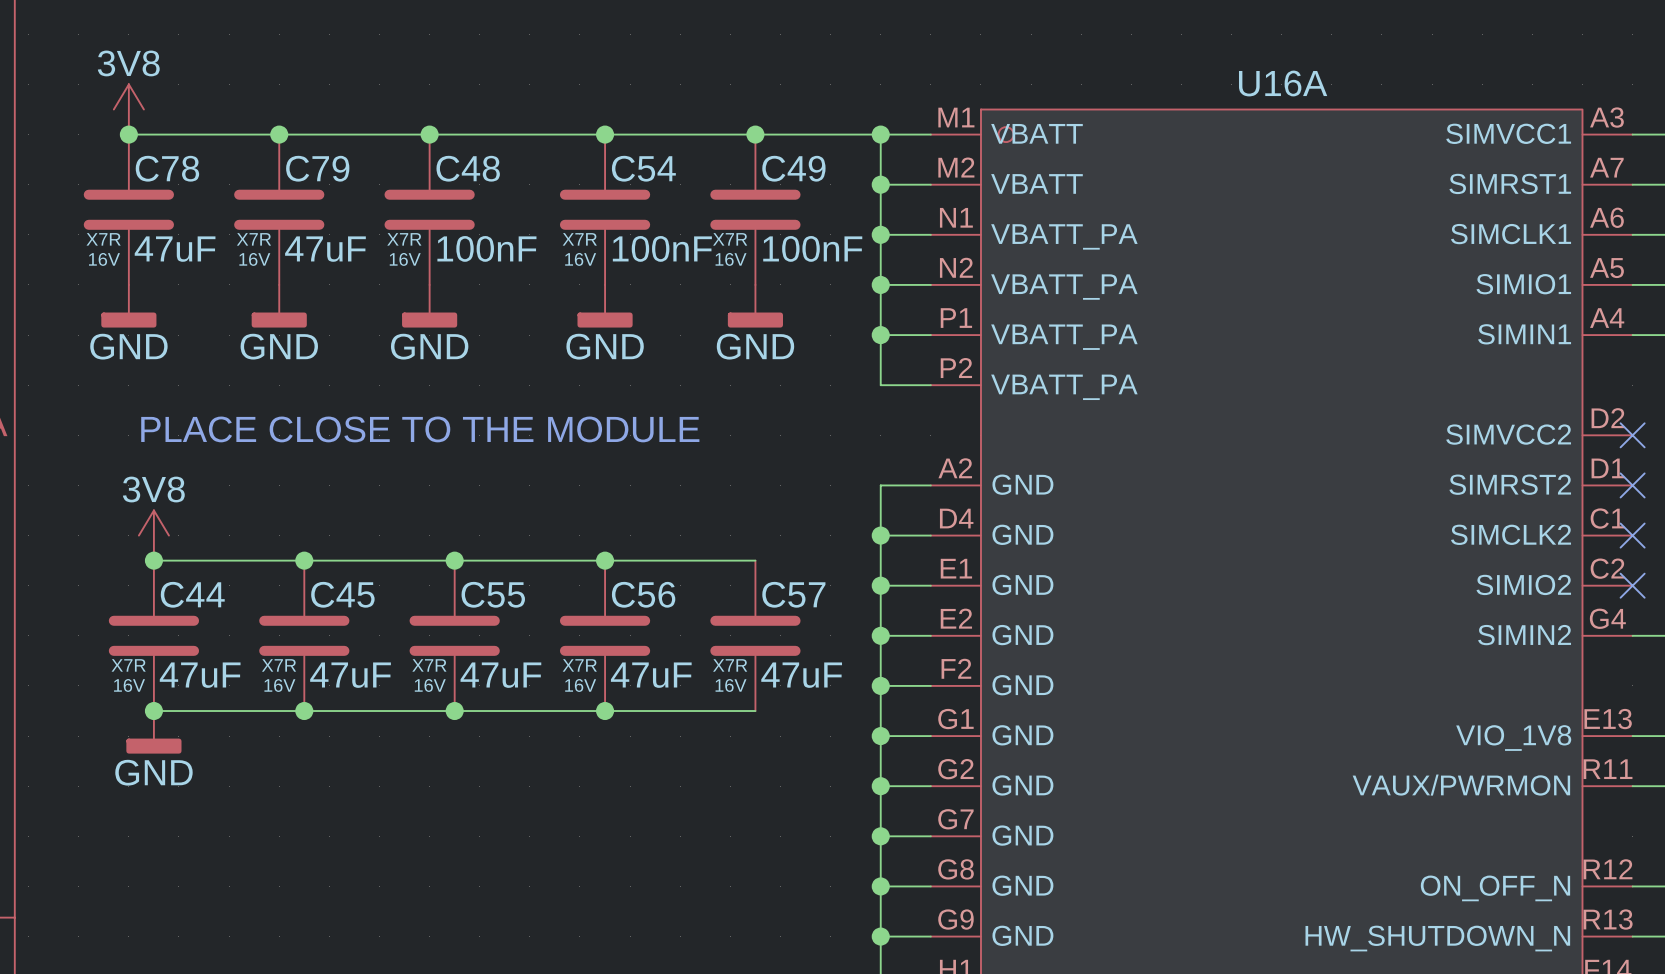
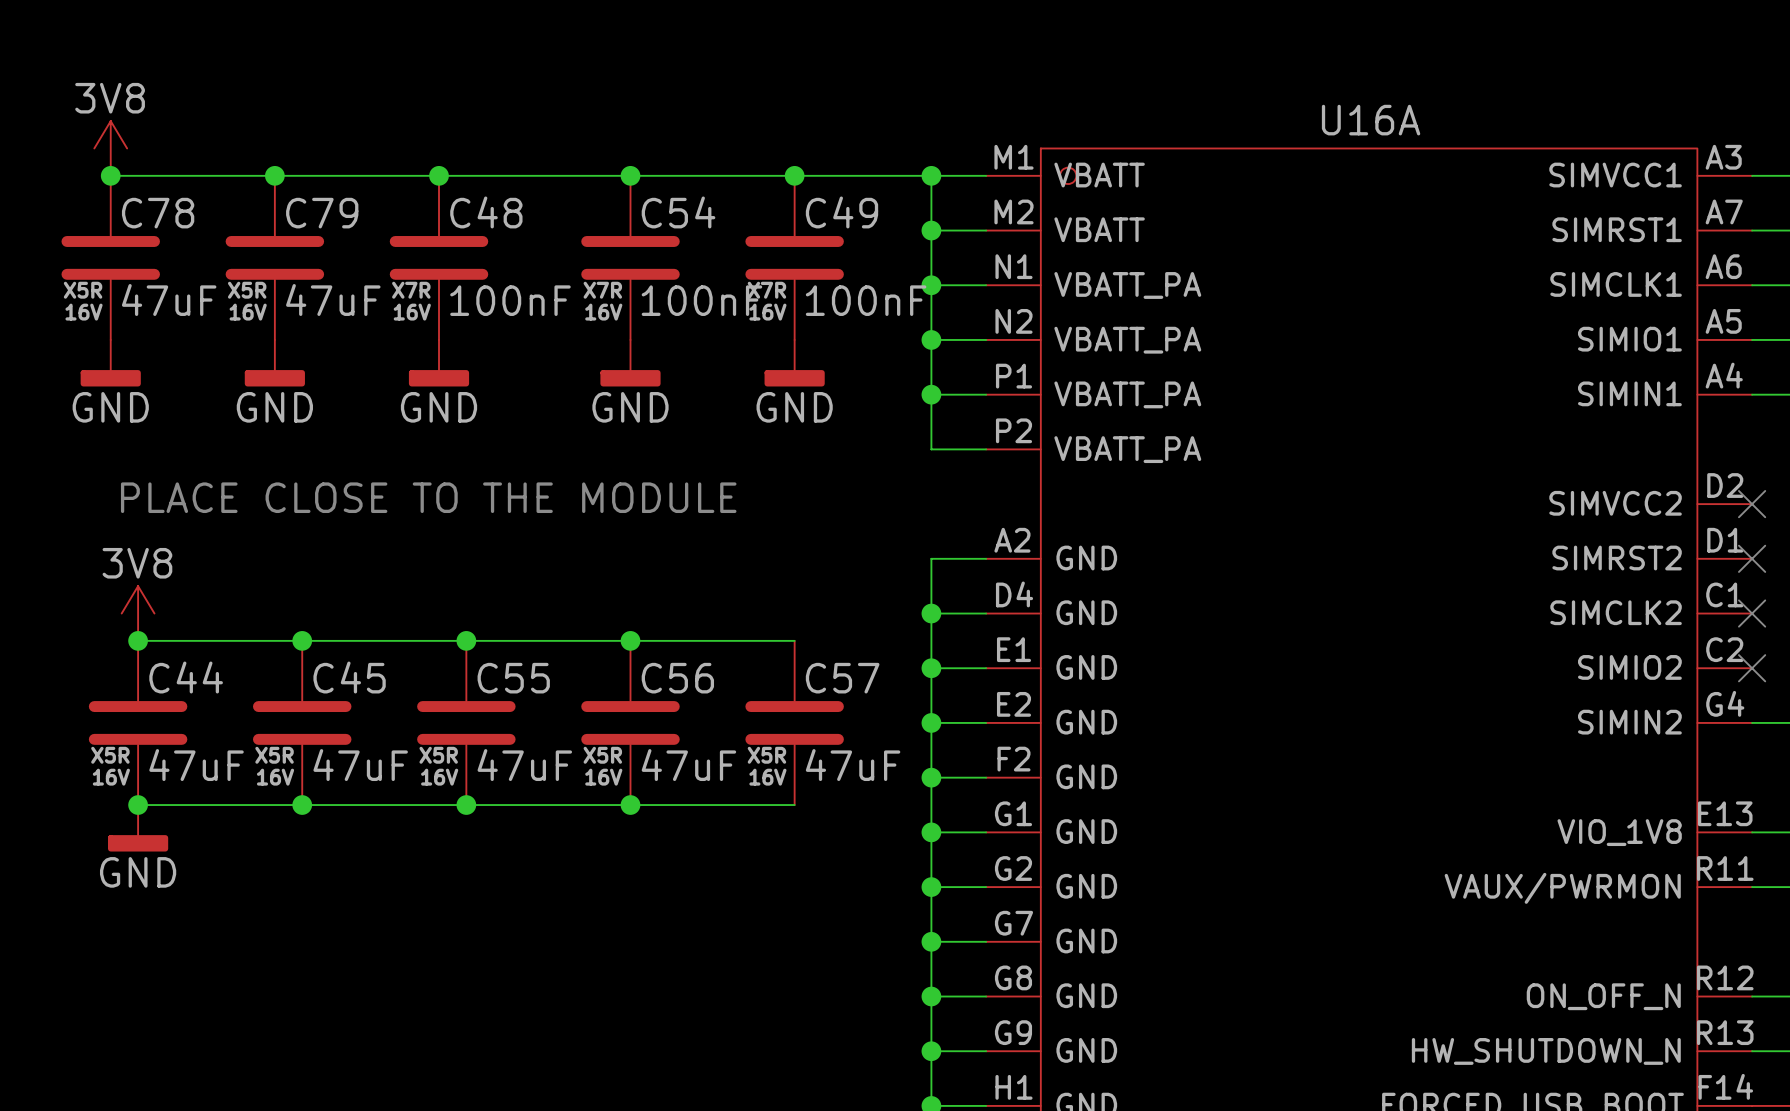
C78 text: X7R (103, 239) -> X5R (83, 290)
C79 text: X7R (253, 239) -> X5R (247, 290)
C44 text: X7R (128, 665) -> X5R (110, 755)
C45 text: X7R (279, 665) -> X5R (274, 755)
C55 text: X7R (429, 665) -> X5R (438, 755)
C56 text: X7R (579, 665) -> X5R (602, 755)
C57 text: X7R (730, 665) -> X5R (766, 755)

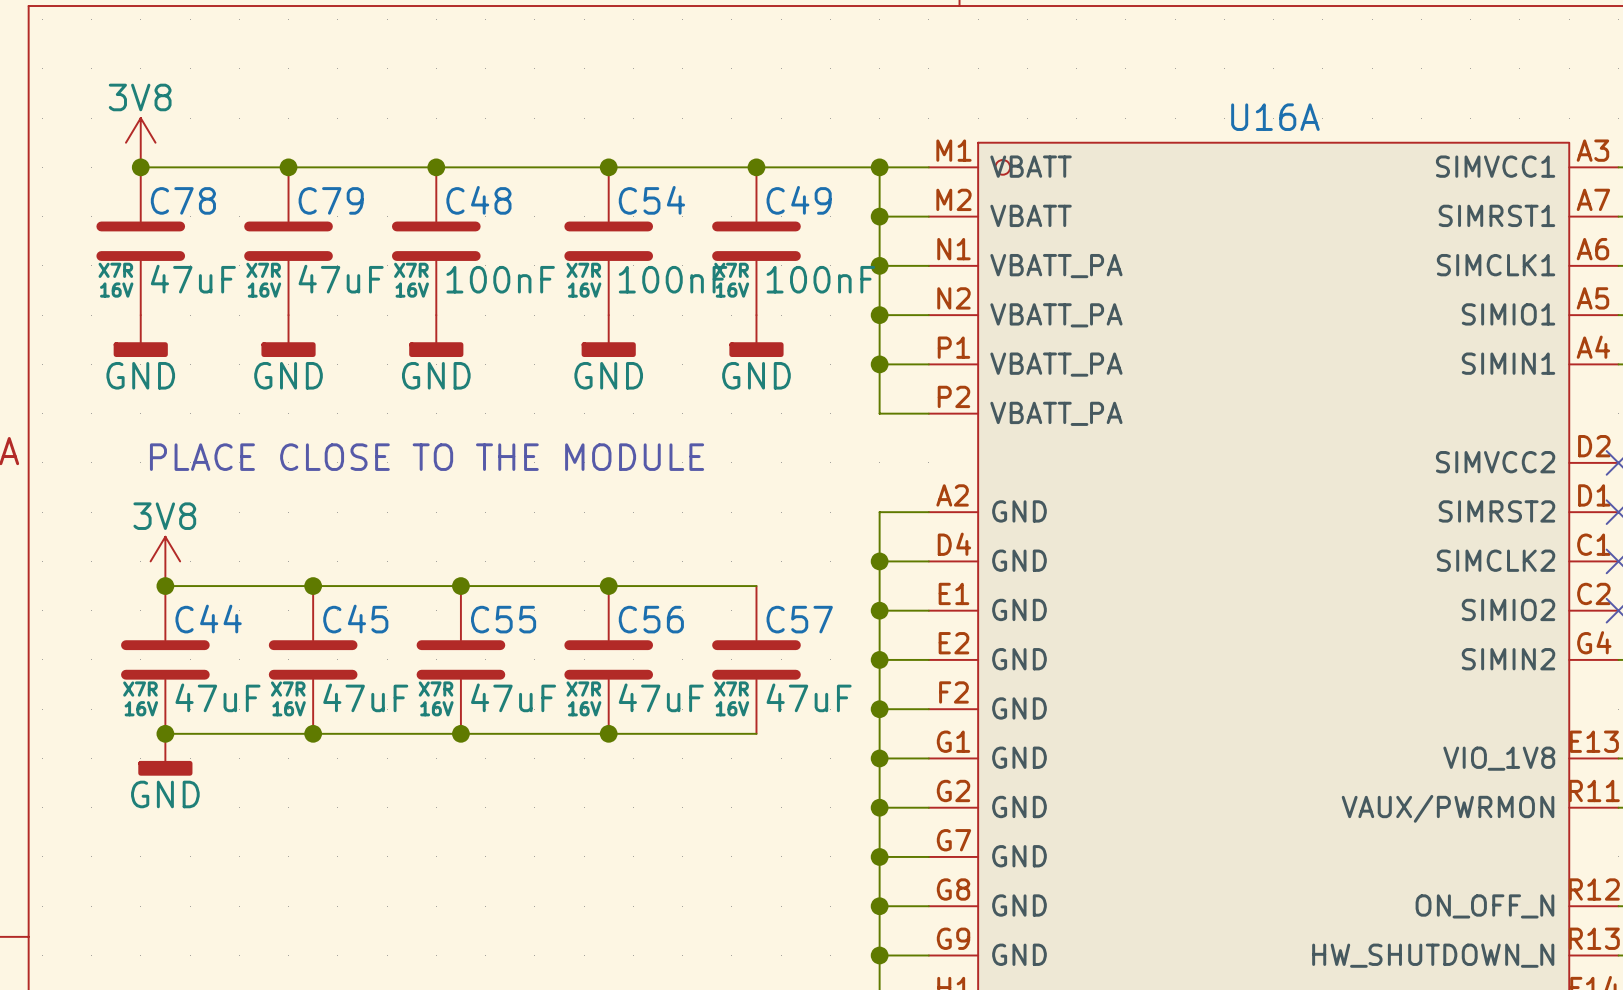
C78 text: X5R (83, 290) -> X7R (115, 270)
C79 text: X5R (247, 290) -> X7R (263, 270)
C44 text: X5R (110, 755) -> X7R (140, 689)
C45 text: X5R (274, 755) -> X7R (288, 689)
C55 text: X5R (438, 755) -> X7R (436, 689)
C56 text: X5R (602, 755) -> X7R (583, 689)
C57 text: X5R (766, 755) -> X7R (731, 689)

